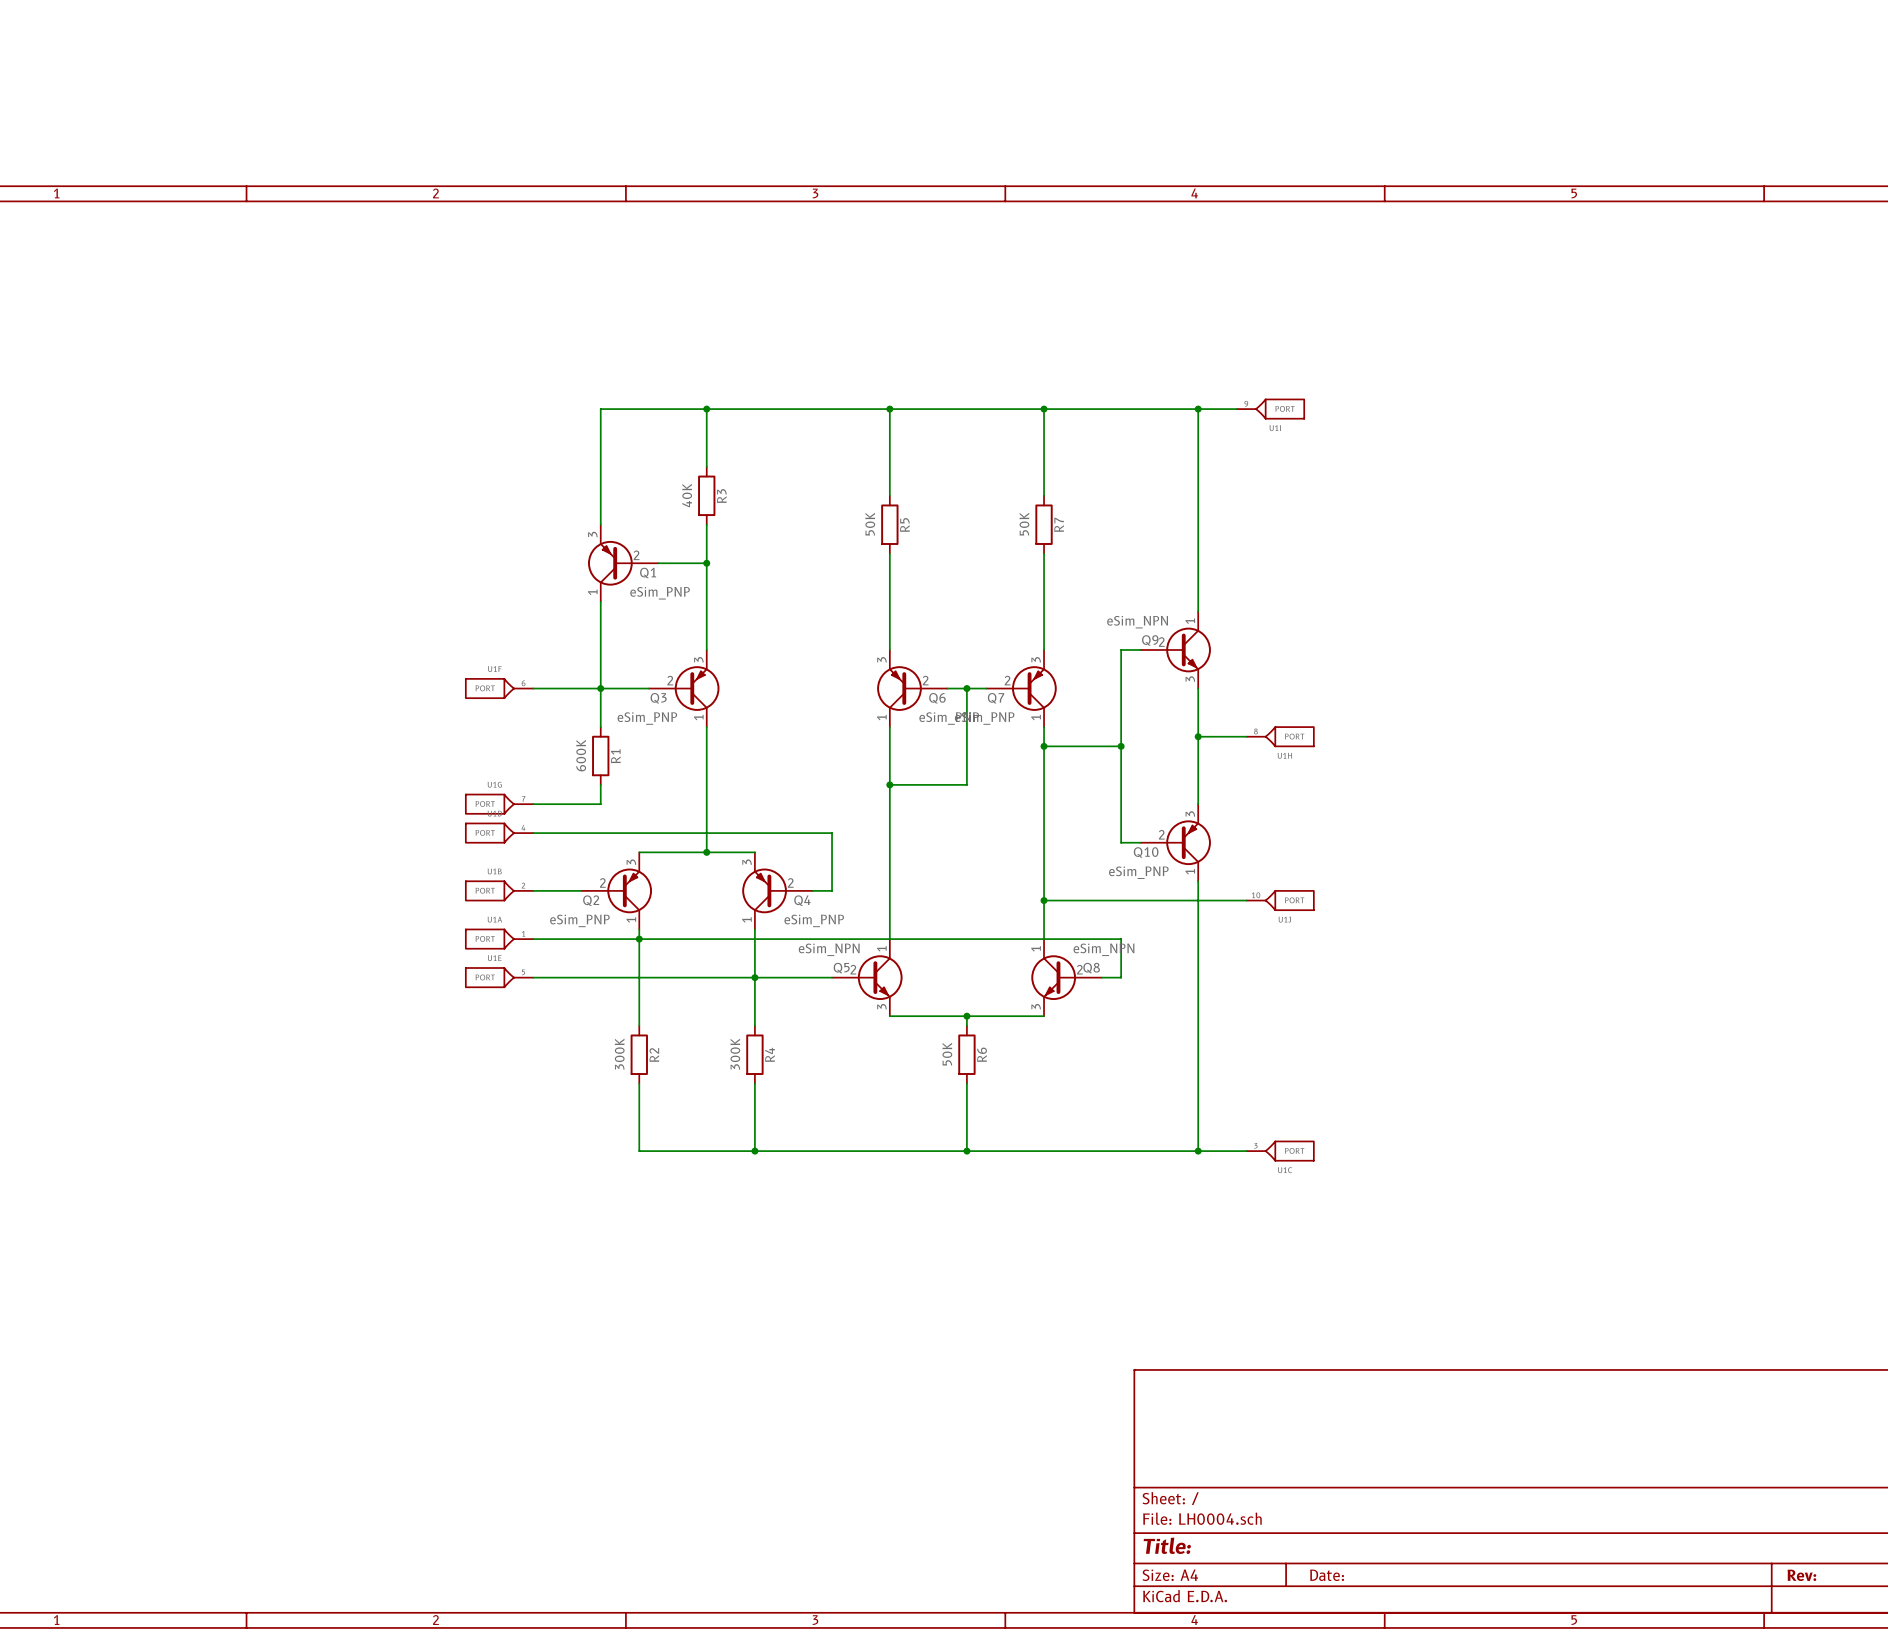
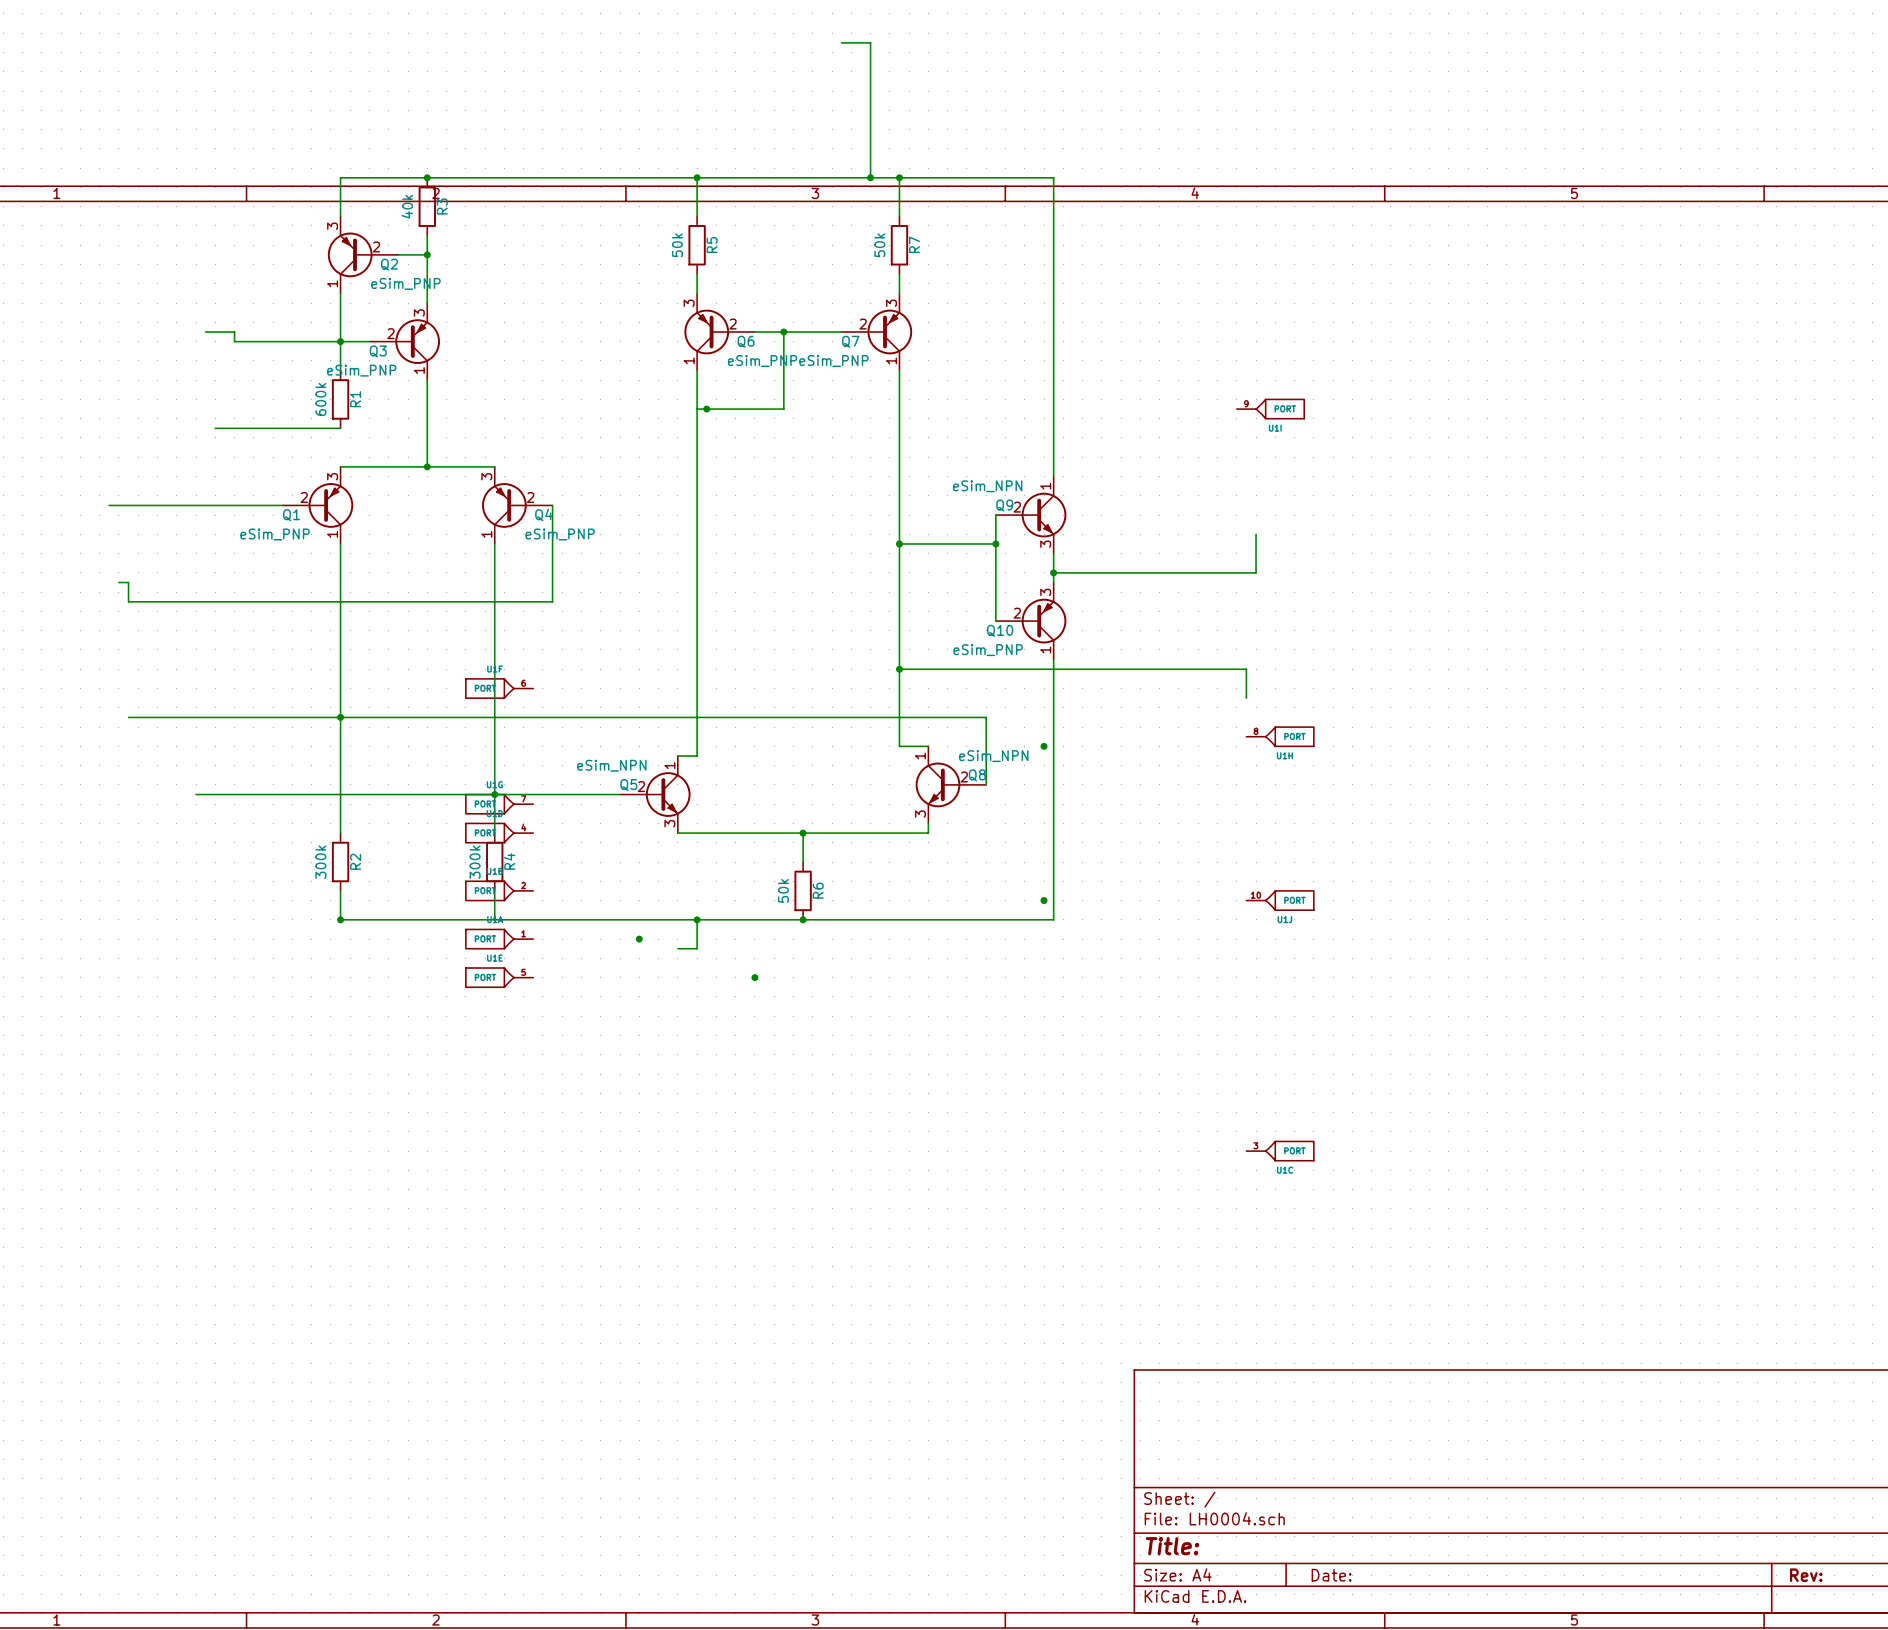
wire: none -> (841, 42) (870, 42) (870, 177)
junction: none -> (427, 177)
wire: none -> (697, 177) (697, 216)
junction: none -> (697, 177)
junction: none -> (870, 177)
wire: none -> (899, 177) (899, 216)
junction: none -> (899, 177)
wire: none -> (340, 216) (340, 177) (1053, 177) (1053, 476)
wire: none -> (427, 235) (427, 303)
wire: none -> (398, 254) (427, 254)
junction: none -> (427, 254)
wire: none -> (697, 274) (697, 293)
wire: none -> (899, 274) (899, 293)
wire: none -> (340, 293) (340, 370)
wire: none -> (205, 331) (234, 331) (234, 341) (369, 341)
wire: none -> (754, 331) (841, 331)
junction: none -> (783, 331)
junction: none -> (340, 341)
wire: none -> (697, 370) (697, 755) (677, 755)
wire: none -> (899, 370) (899, 746) (928, 746)
wire: none -> (427, 380) (427, 466)
wire: (697, 409) (600, 409) (600, 524) -> none
wire: (706, 409) (706, 466) -> none
wire: (783, 409) (1236, 409) -> (783, 409) (783, 331)
wire: (889, 409) (889, 495) -> none
junction: (889, 409) -> none
wire: (1044, 409) (1044, 495) -> none
junction: (1044, 409) -> none
wire: (1198, 409) (1198, 611) -> none
junction: (1198, 409) -> none
wire: none -> (215, 428) (340, 428)
wire: none -> (340, 466) (494, 466)
junction: none -> (427, 466)
R3 value: 40K (687, 495) -> 40k (407, 206)
R3 position: (706, 495) -> (427, 206)
wire: none -> (109, 505) (282, 505)
wire: none -> (552, 505) (552, 601) (128, 601) (128, 582) (118, 582)
wire: none -> (995, 515) (995, 621)
wire: (706, 524) (706, 649) -> none
R5 value: 50K (870, 524) -> 50k (677, 245)
R5 position: (889, 524) -> (697, 245)
R7 value: 50K (1024, 524) -> 50k (879, 245)
R7 position: (1044, 524) -> (899, 245)
wire: none -> (1256, 534) (1256, 572) (1053, 572)
wire: none -> (340, 543) (340, 833)
wire: none -> (494, 543) (494, 833)
wire: none -> (899, 543) (995, 543)
junction: none -> (899, 543)
junction: none -> (995, 543)
wire: (889, 553) (889, 649) -> none
wire: (1044, 553) (1044, 649) -> none
wire: none -> (1053, 553) (1053, 582)
Q1 flip: as is (610, 563) -> left-right (330, 505)
Q1 position: (623, 563) -> (318, 505)
wire: (658, 563) (706, 563) -> none
junction: (706, 563) -> none
junction: none -> (1053, 572)
wire: (600, 601) (600, 727) -> none
wire: (1140, 649) (1121, 649) (1121, 842) (1140, 842) -> none
Q9 position: (1175, 649) -> (1031, 515)
wire: none -> (1053, 659) (1053, 919) (340, 919) (340, 890)
wire: none -> (899, 669) (1246, 669) (1246, 698)
junction: none -> (899, 669)
wire: (533, 688) (648, 688) -> none
junction: (600, 688) -> none
Q3 position: (684, 688) -> (404, 341)
Q6 position: (912, 688) -> (719, 331)
wire: (947, 688) (986, 688) -> none
wire: (966, 688) (966, 784) (889, 784) -> none
junction: (966, 688) -> none
Q7 position: (1021, 688) -> (876, 331)
wire: (1198, 688) (1198, 804) -> none
wire: none -> (128, 717) (986, 717) (986, 784)
junction: none -> (340, 717)
wire: (706, 727) (706, 852) -> none
wire: (889, 727) (889, 939) -> none
wire: (1044, 727) (1044, 939) -> none
wire: (1198, 736) (1246, 736) -> none
junction: (1198, 736) -> none
wire: (1044, 746) (1121, 746) -> none
junction: (1121, 746) -> none
R1 value: 600K (581, 755) -> 600k (320, 399)
R1 position: (600, 755) -> (340, 399)
wire: (600, 784) (600, 804) (533, 804) -> none
junction: (889, 784) -> none
wire: none -> (196, 794) (620, 794)
junction: none -> (494, 794)
wire: (533, 833) (677, 833) -> none
wire: none -> (803, 833) (803, 862)
junction: none -> (803, 833)
wire: (832, 833) (832, 890) (812, 890) -> (832, 833) (928, 833) (928, 823)
Q10 position: (1175, 842) -> (1031, 621)
wire: (639, 852) (754, 852) -> none
junction: (706, 852) -> none
wire: (1198, 881) (1198, 1151) -> none
wire: none -> (494, 890) (494, 919)
wire: (533, 890) (581, 890) -> none
Q2 position: (616, 890) -> (363, 254)
Q2 flip: as is (629, 890) -> left-right (350, 254)
Q4 position: (777, 890) -> (517, 505)
wire: (1044, 900) (1246, 900) -> none
junction: none -> (340, 919)
wire: none -> (697, 919) (697, 948) (677, 948)
junction: none -> (697, 919)
junction: none -> (803, 919)
wire: (639, 929) (639, 1025) -> none
wire: (754, 929) (754, 1025) -> none
wire: (533, 939) (1121, 939) (1121, 977) (1101, 977) -> none
wire: (533, 977) (832, 977) -> none
Q5 position: (867, 977) -> (655, 794)
Q8 position: (1066, 977) -> (950, 784)
wire: (889, 1016) (1044, 1016) -> none
wire: (966, 1016) (966, 1025) -> none
junction: (966, 1016) -> none
R2 value: 300K (619, 1054) -> 300k (320, 862)
R2 position: (639, 1054) -> (340, 862)
R4 value: 300K (735, 1054) -> 300k (475, 862)
R4 position: (754, 1054) -> (494, 862)
R6 value: 50K (947, 1054) -> 50k (783, 890)
R6 position: (966, 1054) -> (803, 890)
wire: (639, 1083) (639, 1151) (1246, 1151) -> none
wire: (754, 1083) (754, 1151) -> none
wire: (966, 1083) (966, 1151) -> none
junction: (754, 1151) -> none
junction: (966, 1151) -> none
junction: (1198, 1151) -> none

